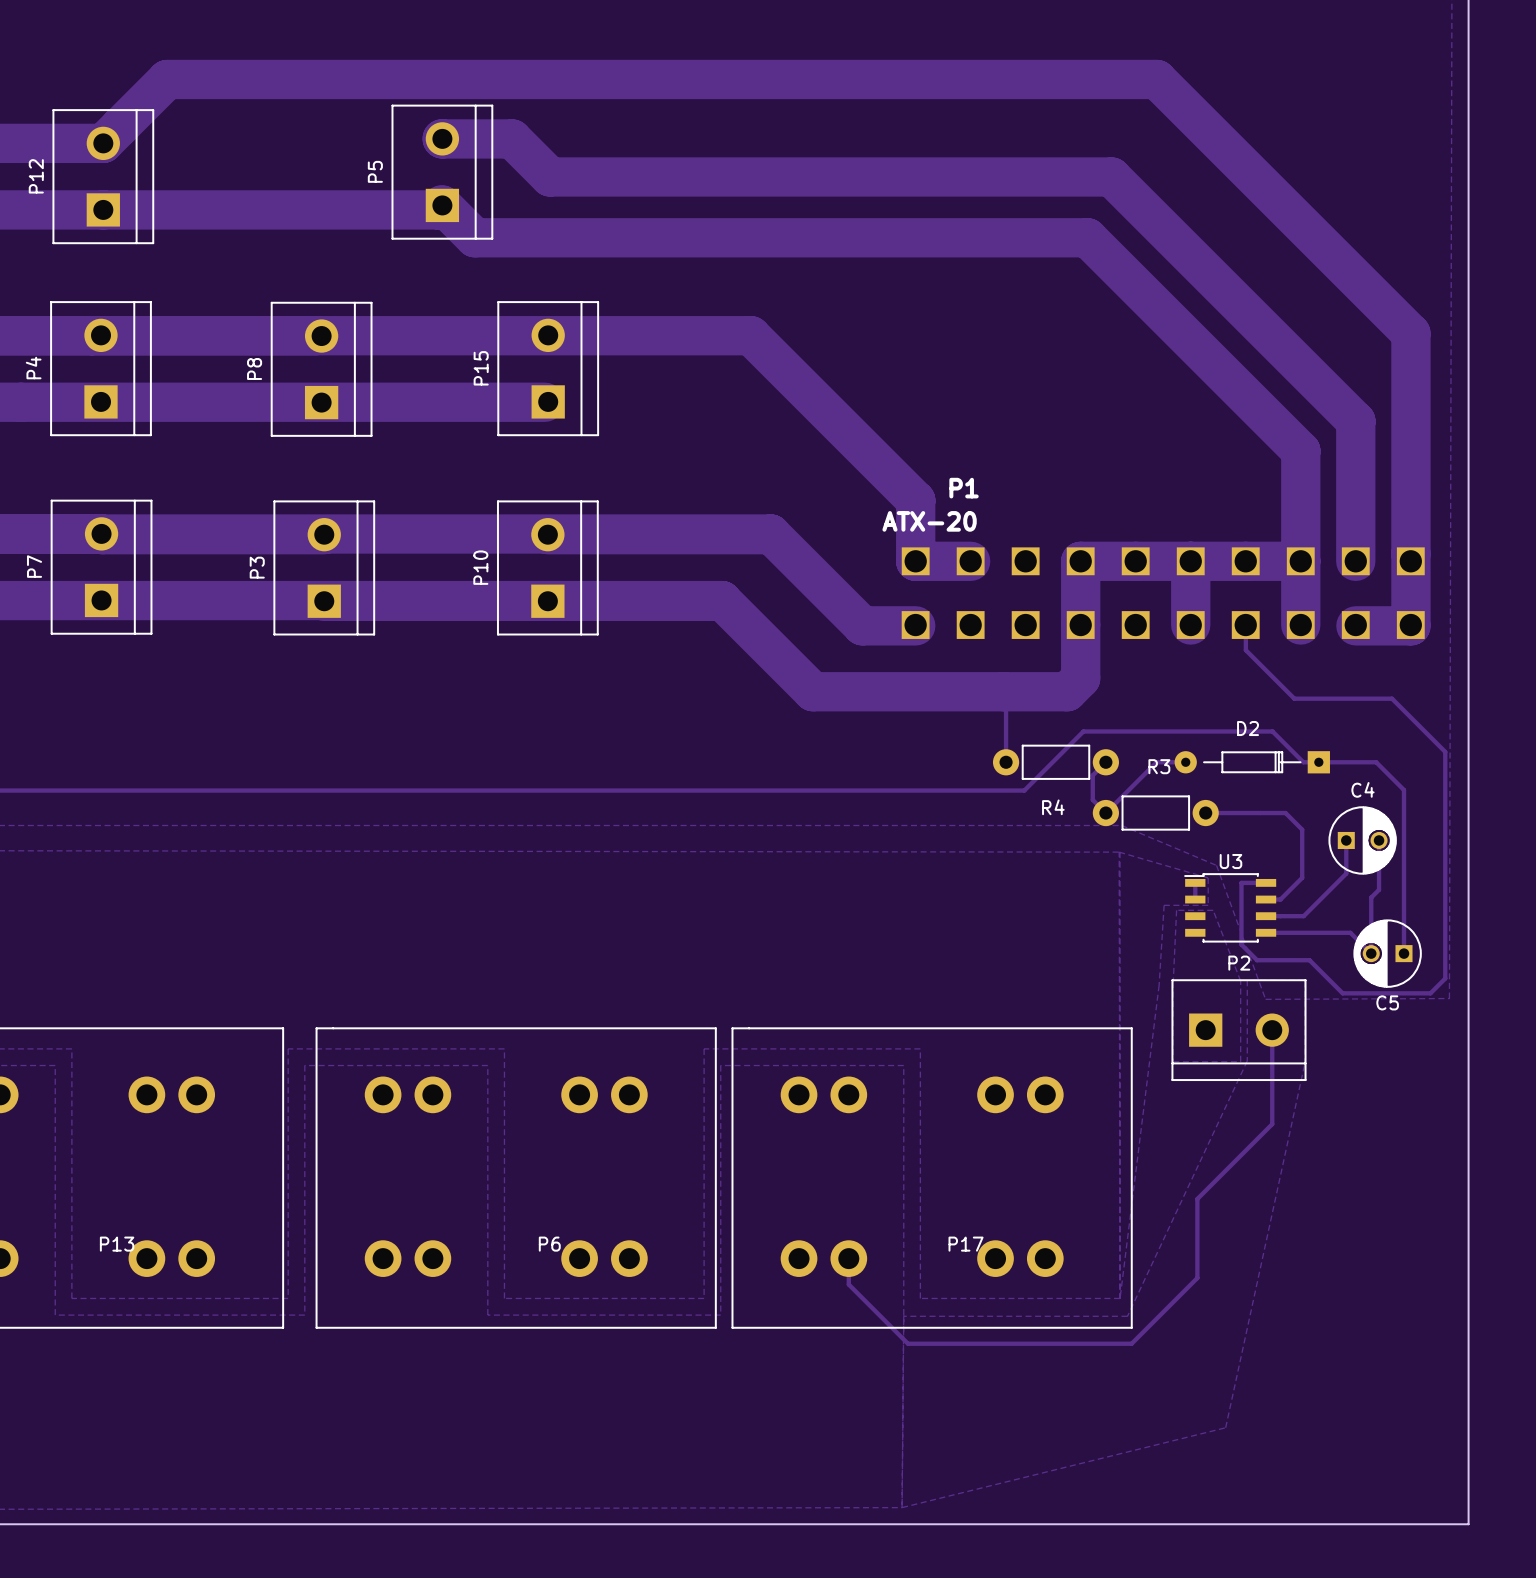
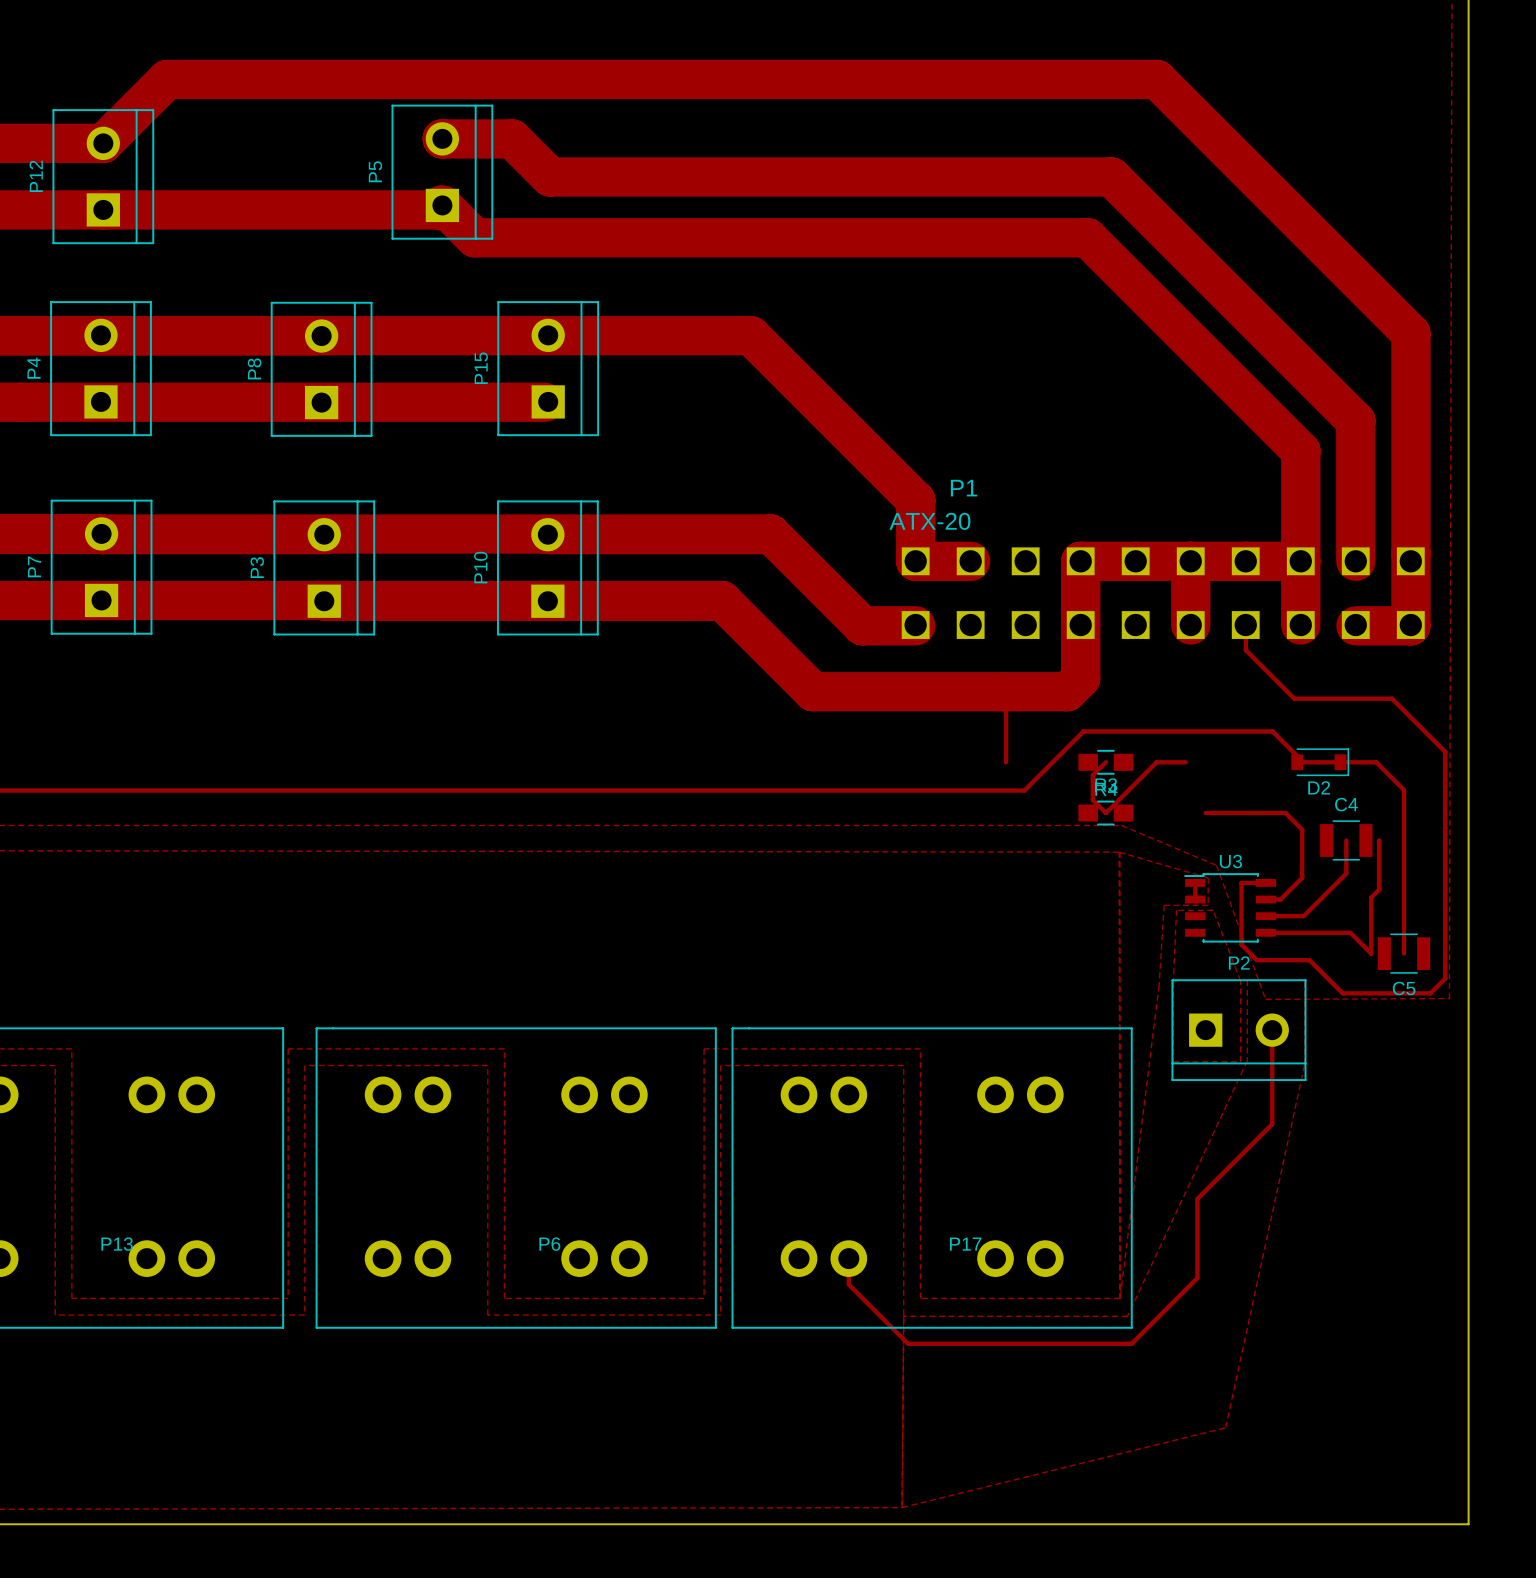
D2 name position: D2 (1248, 728) -> D2 (1319, 787)
R4 footprint: [992, 744, 1119, 780] -> [1078, 749, 1134, 775]
D2 footprint: [1174, 751, 1330, 774] -> [1291, 748, 1350, 777]
R3 footprint: [1092, 795, 1219, 831] -> [1078, 800, 1134, 826]
C4 footprint: [1328, 806, 1397, 875] -> [1320, 820, 1373, 861]
C5 footprint: [1353, 919, 1422, 988] -> [1377, 933, 1431, 974]

